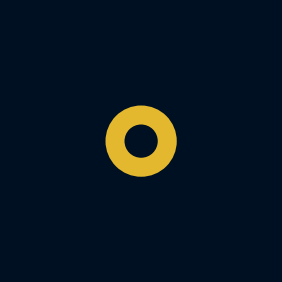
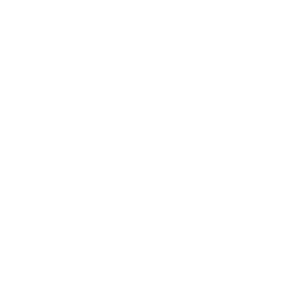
part: (141, 141) -> none

